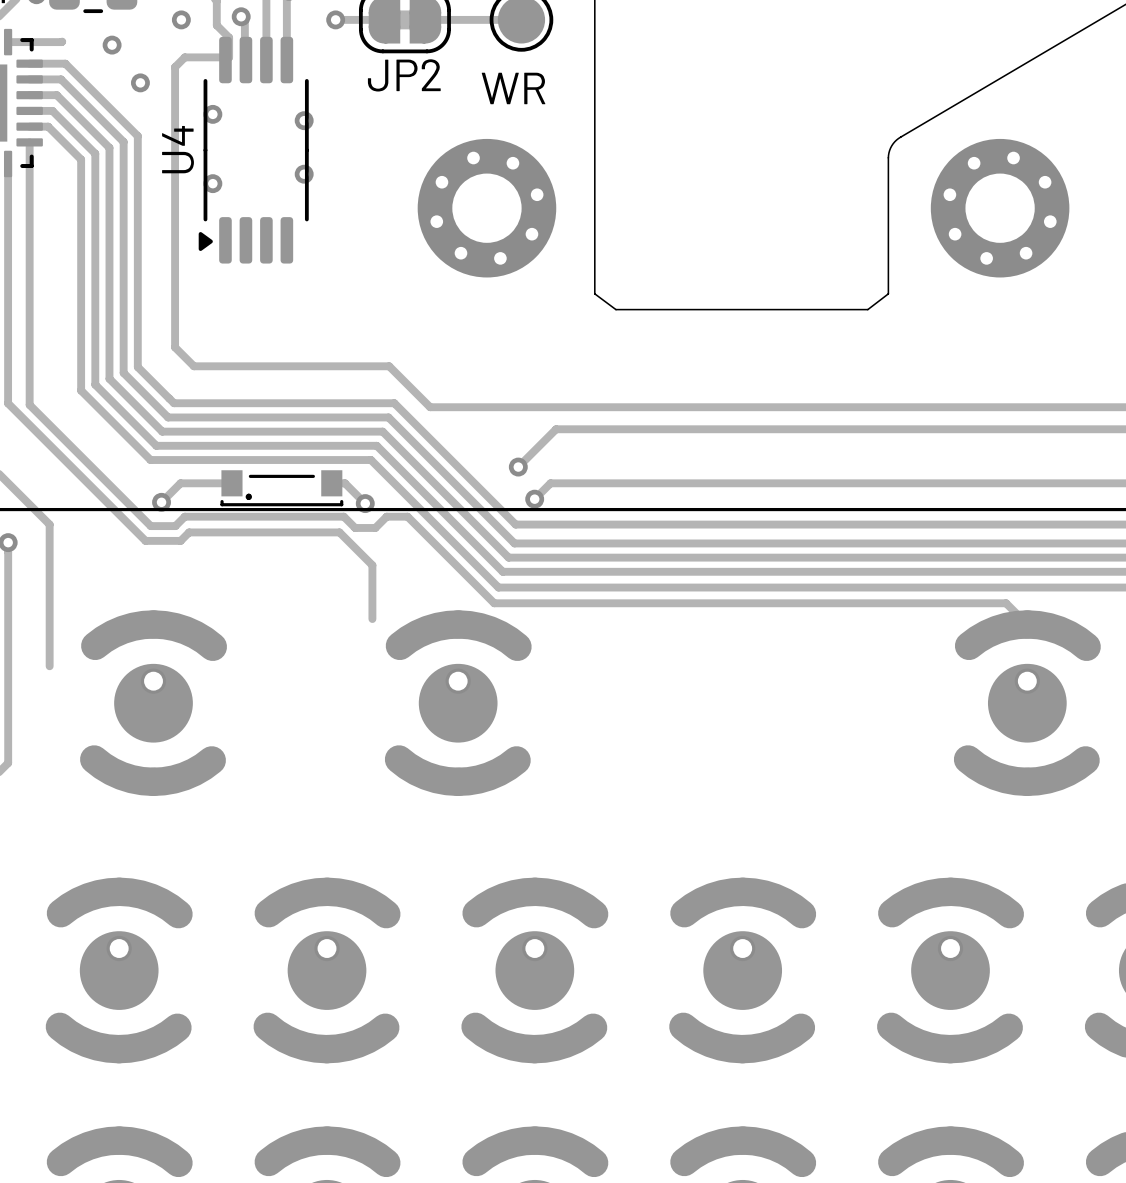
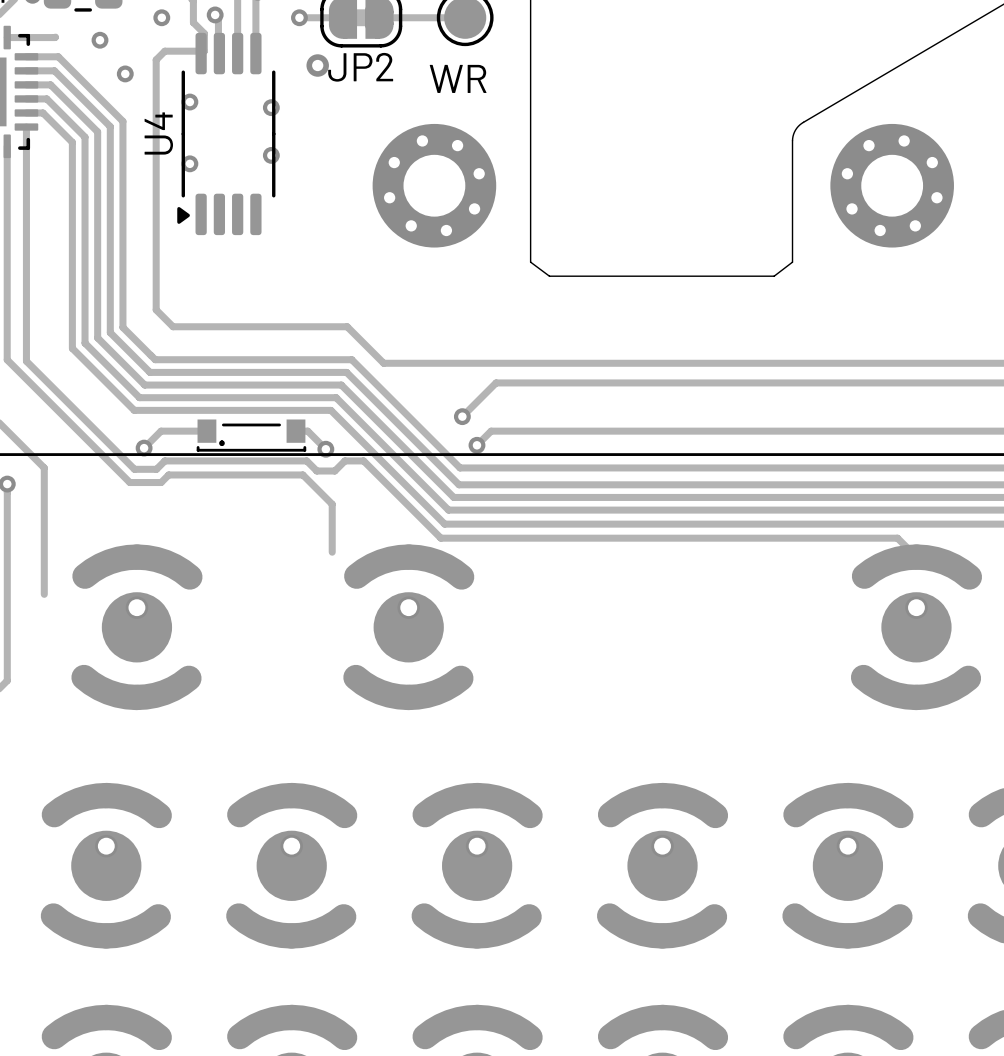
via: none -> (317, 65)

